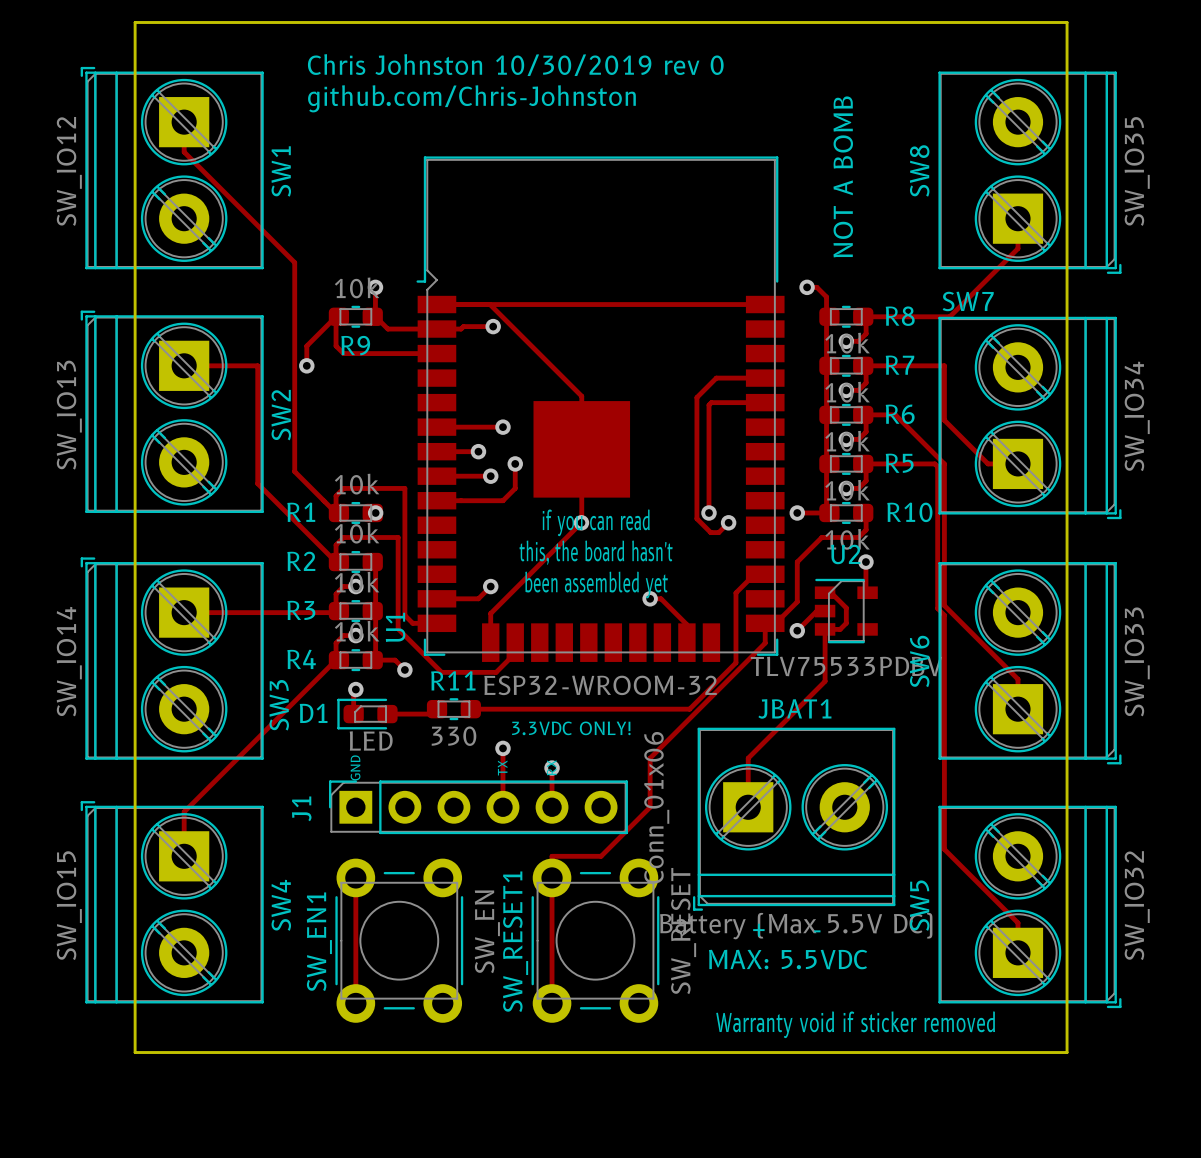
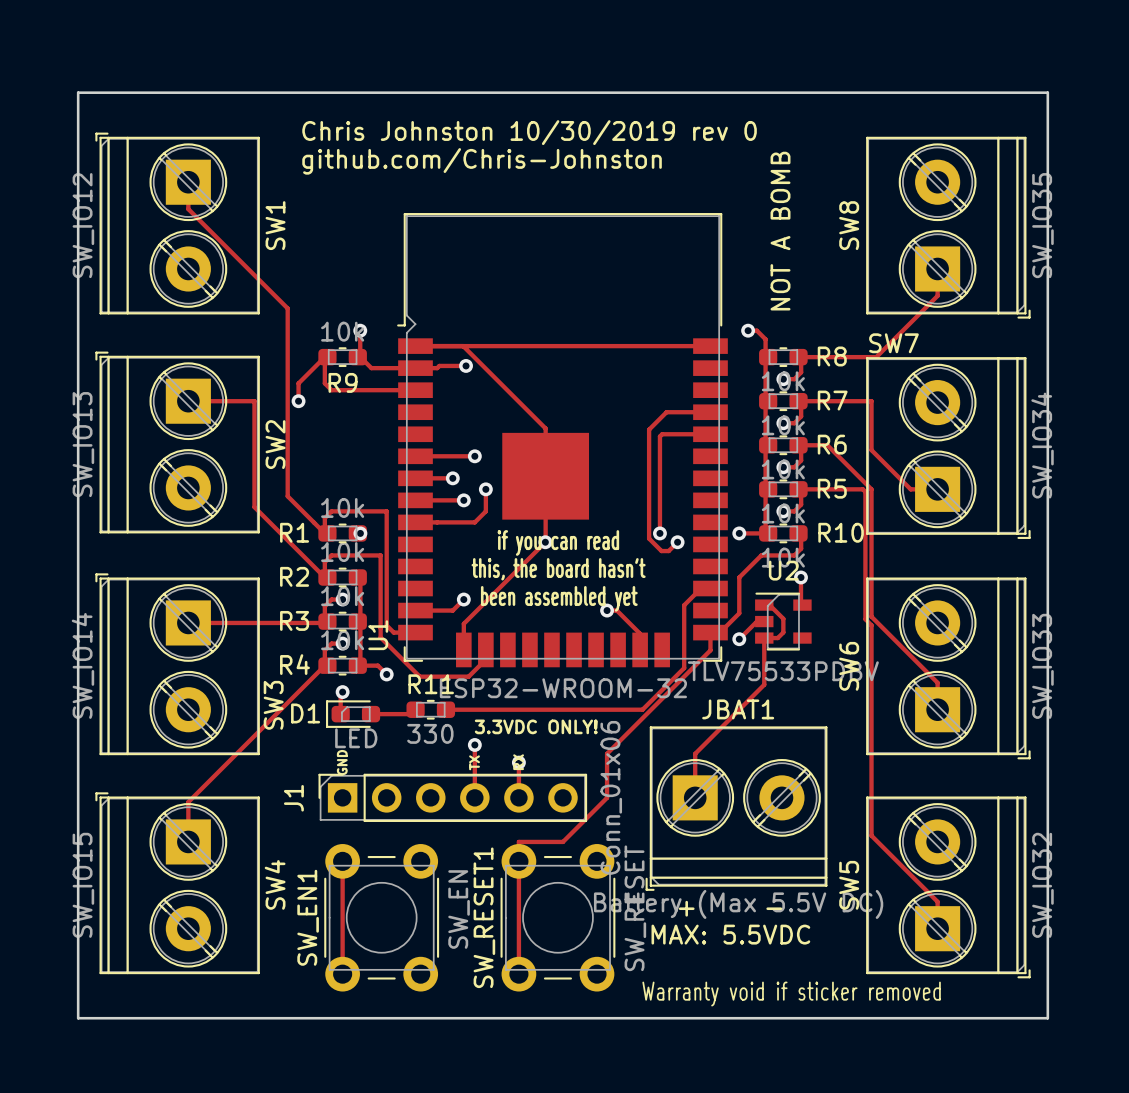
board edge: (135, 22) (135, 1052) -> (144, 92) (78, 92) (78, 1018) (144, 1018)
board edge: (1067, 22) (1067, 1052) -> (981, 92) (1047, 92) (1047, 1018) (981, 1018)

